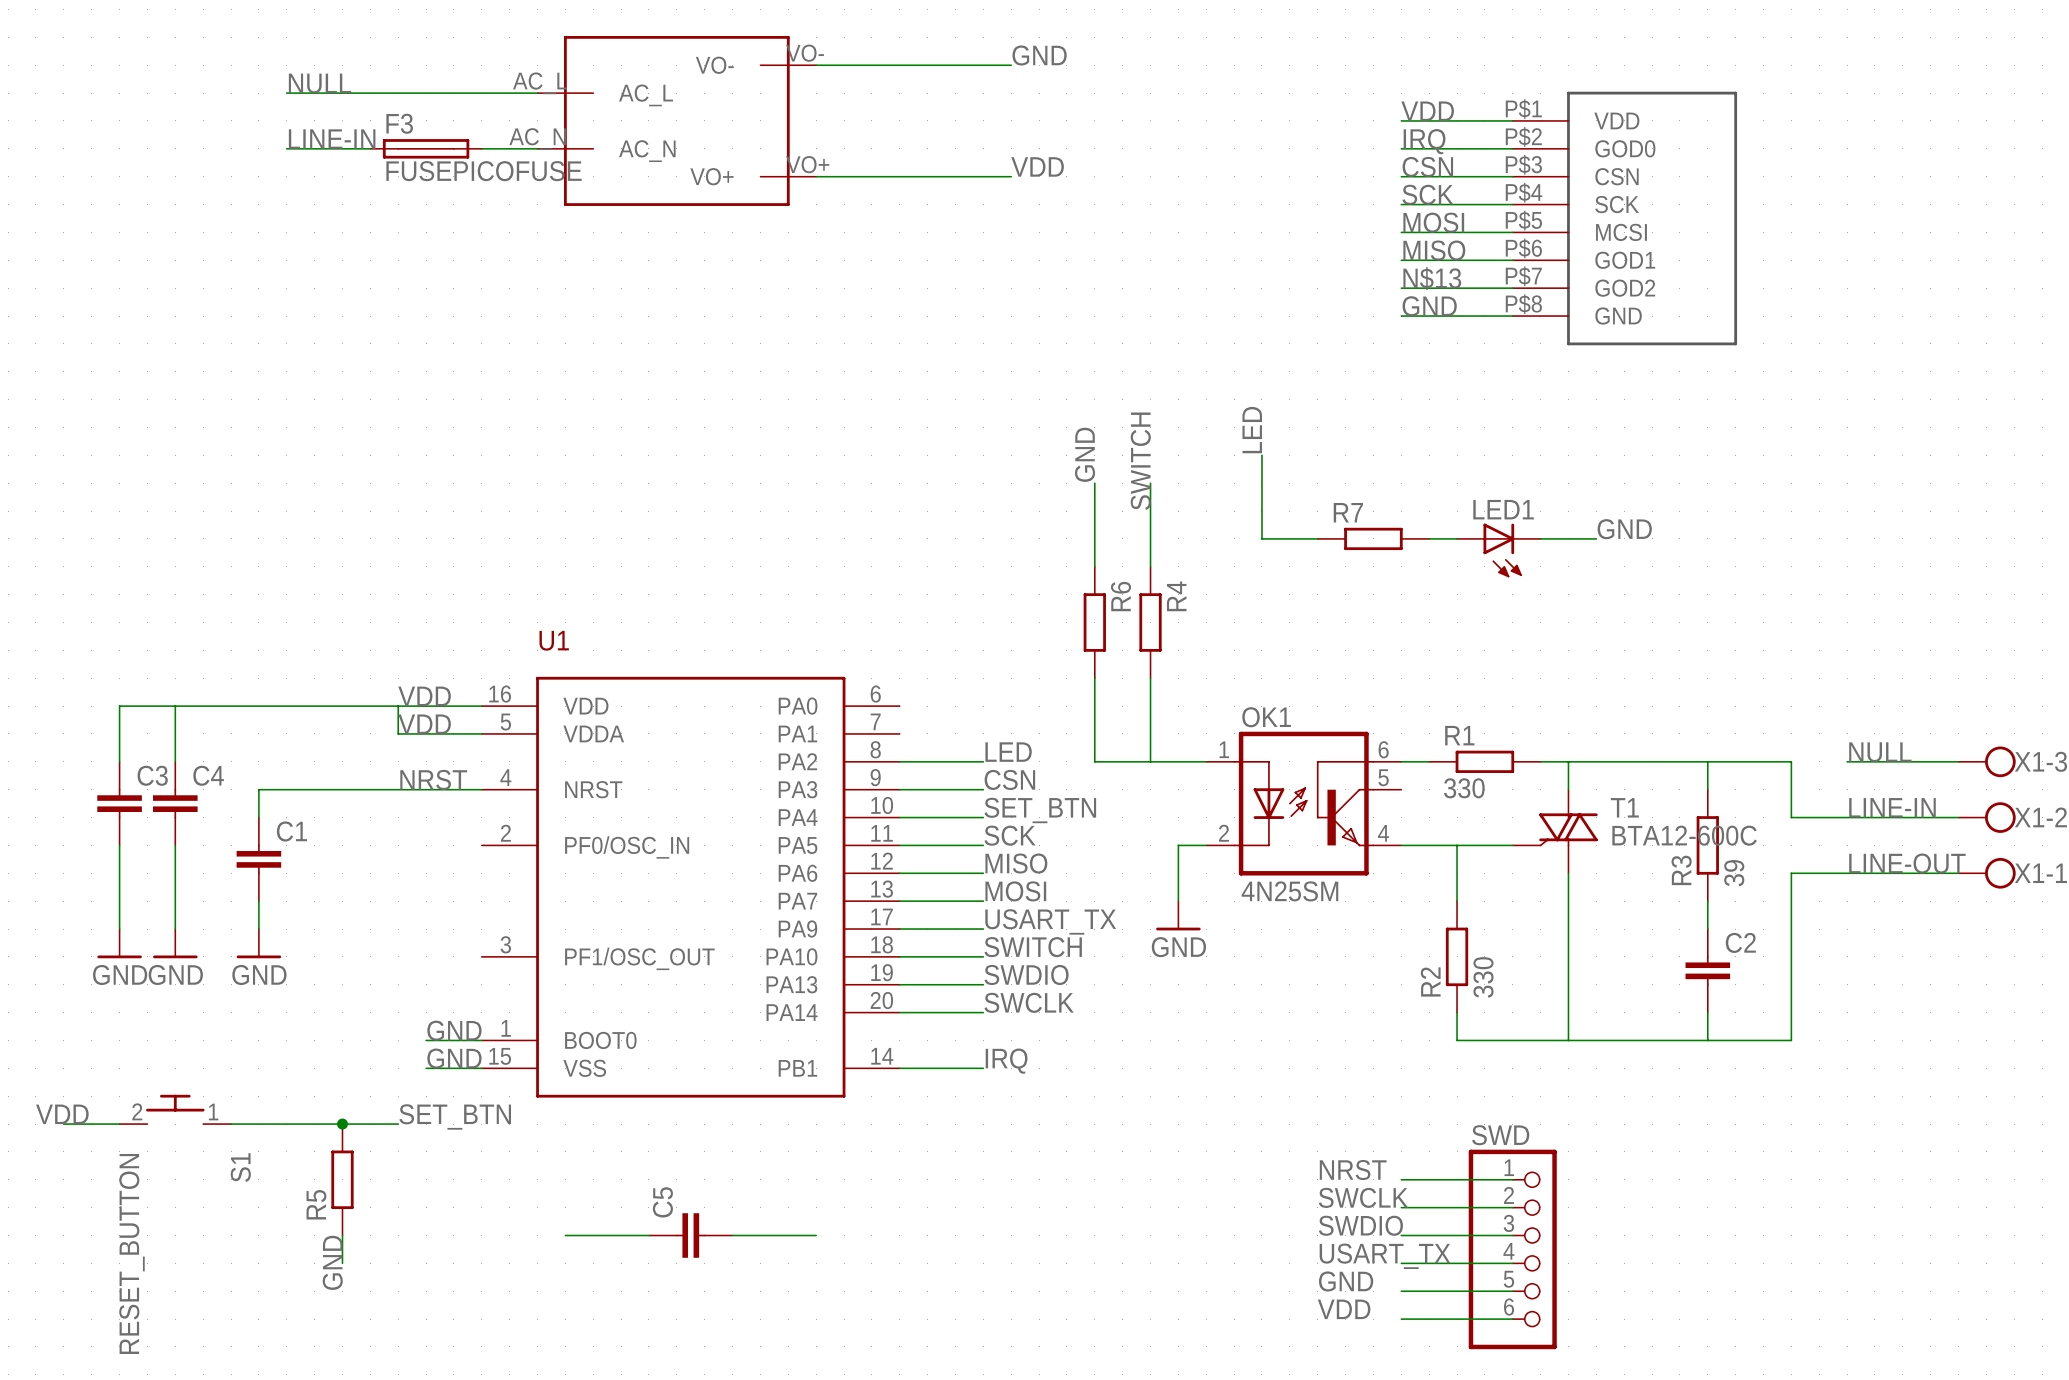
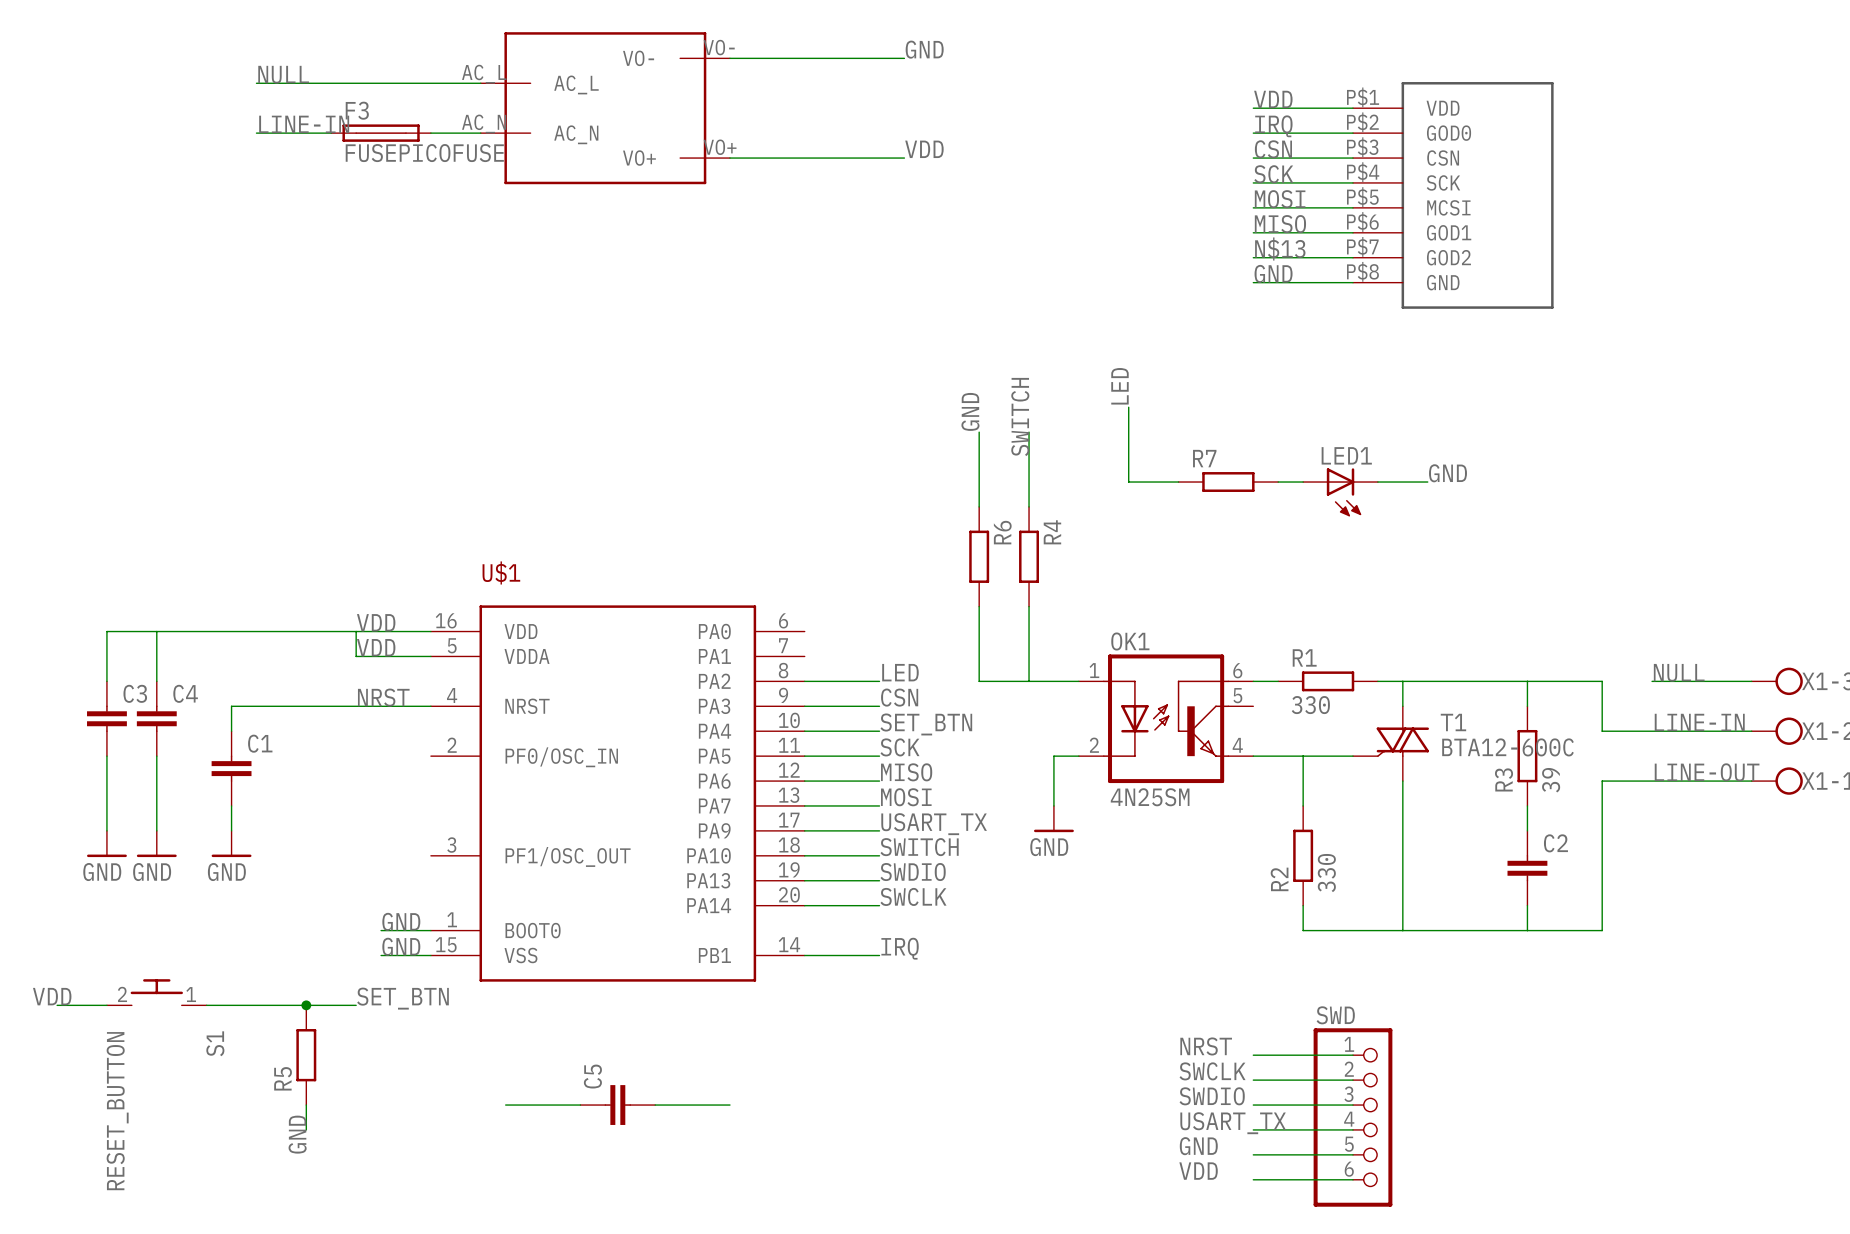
U1 name: U1 (554, 640) -> U$1 (501, 572)

